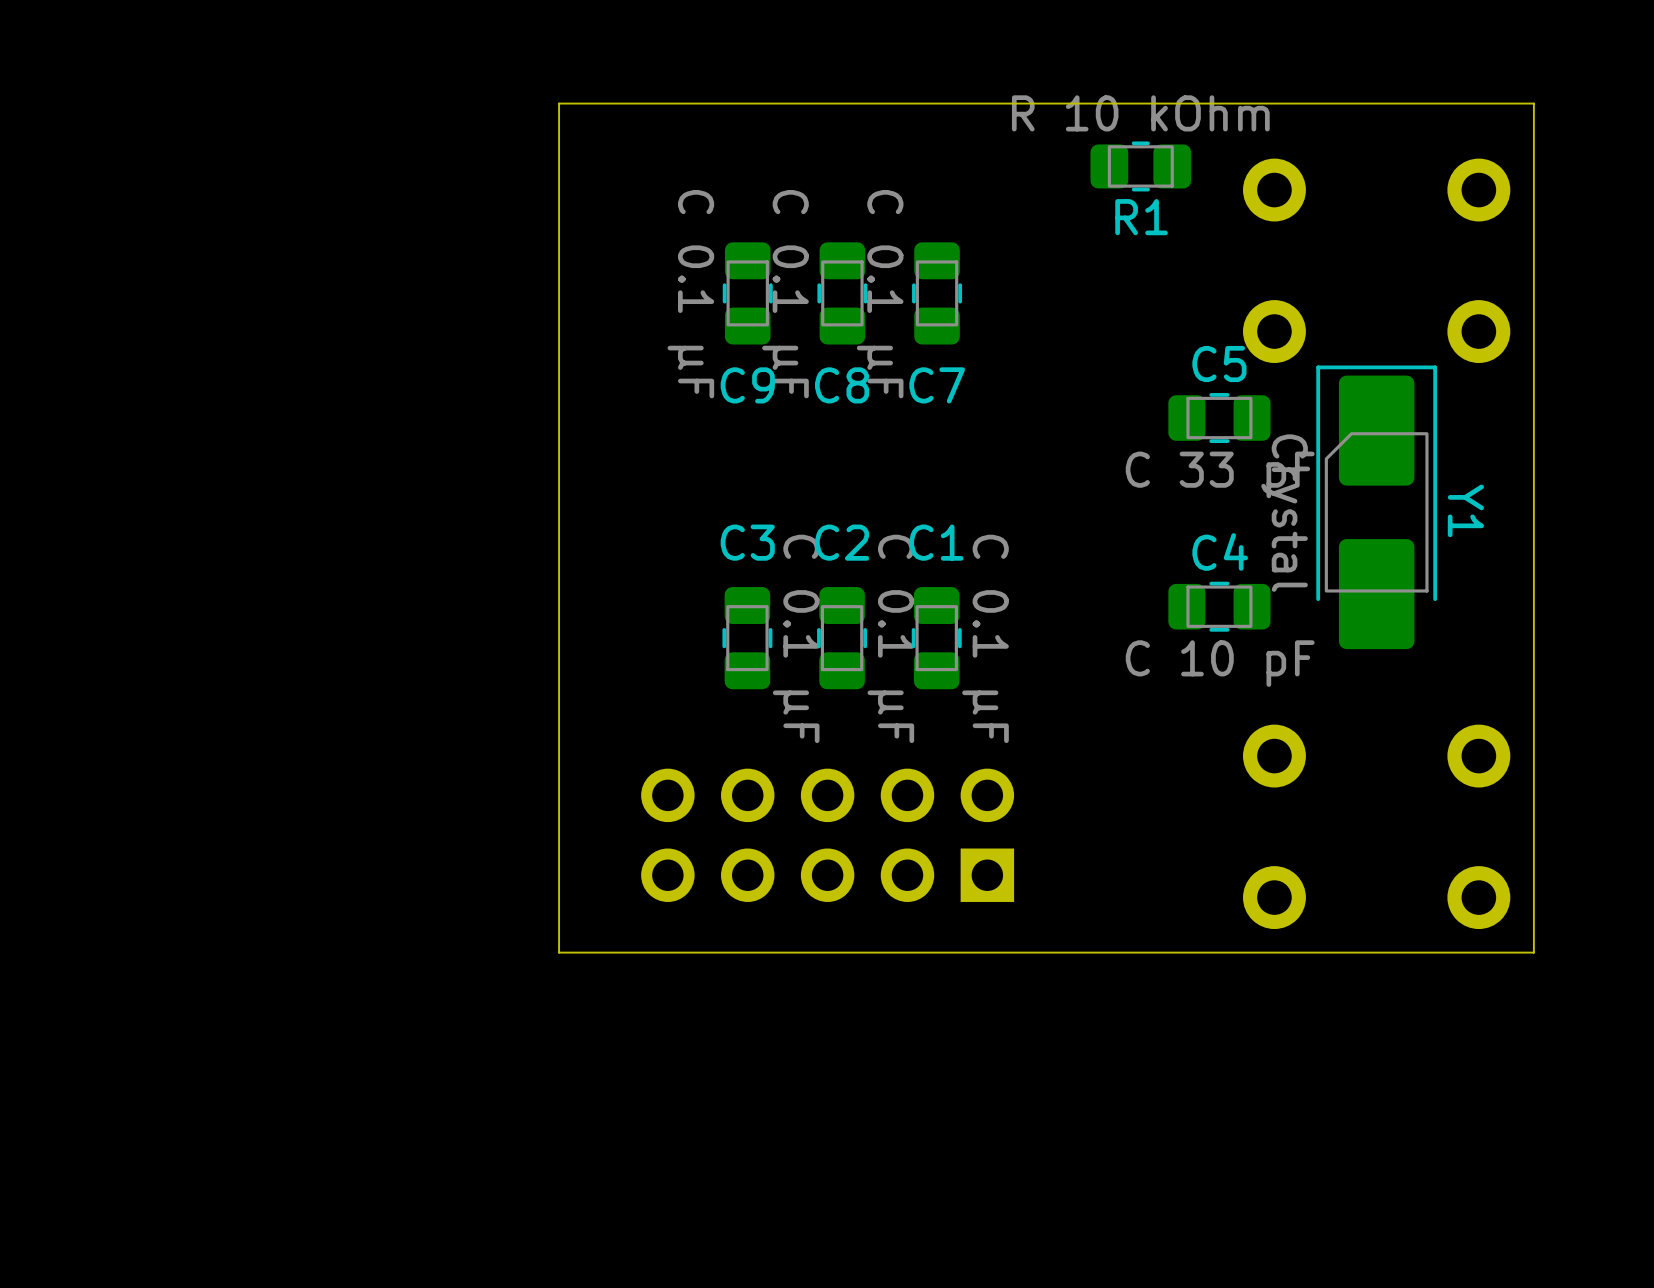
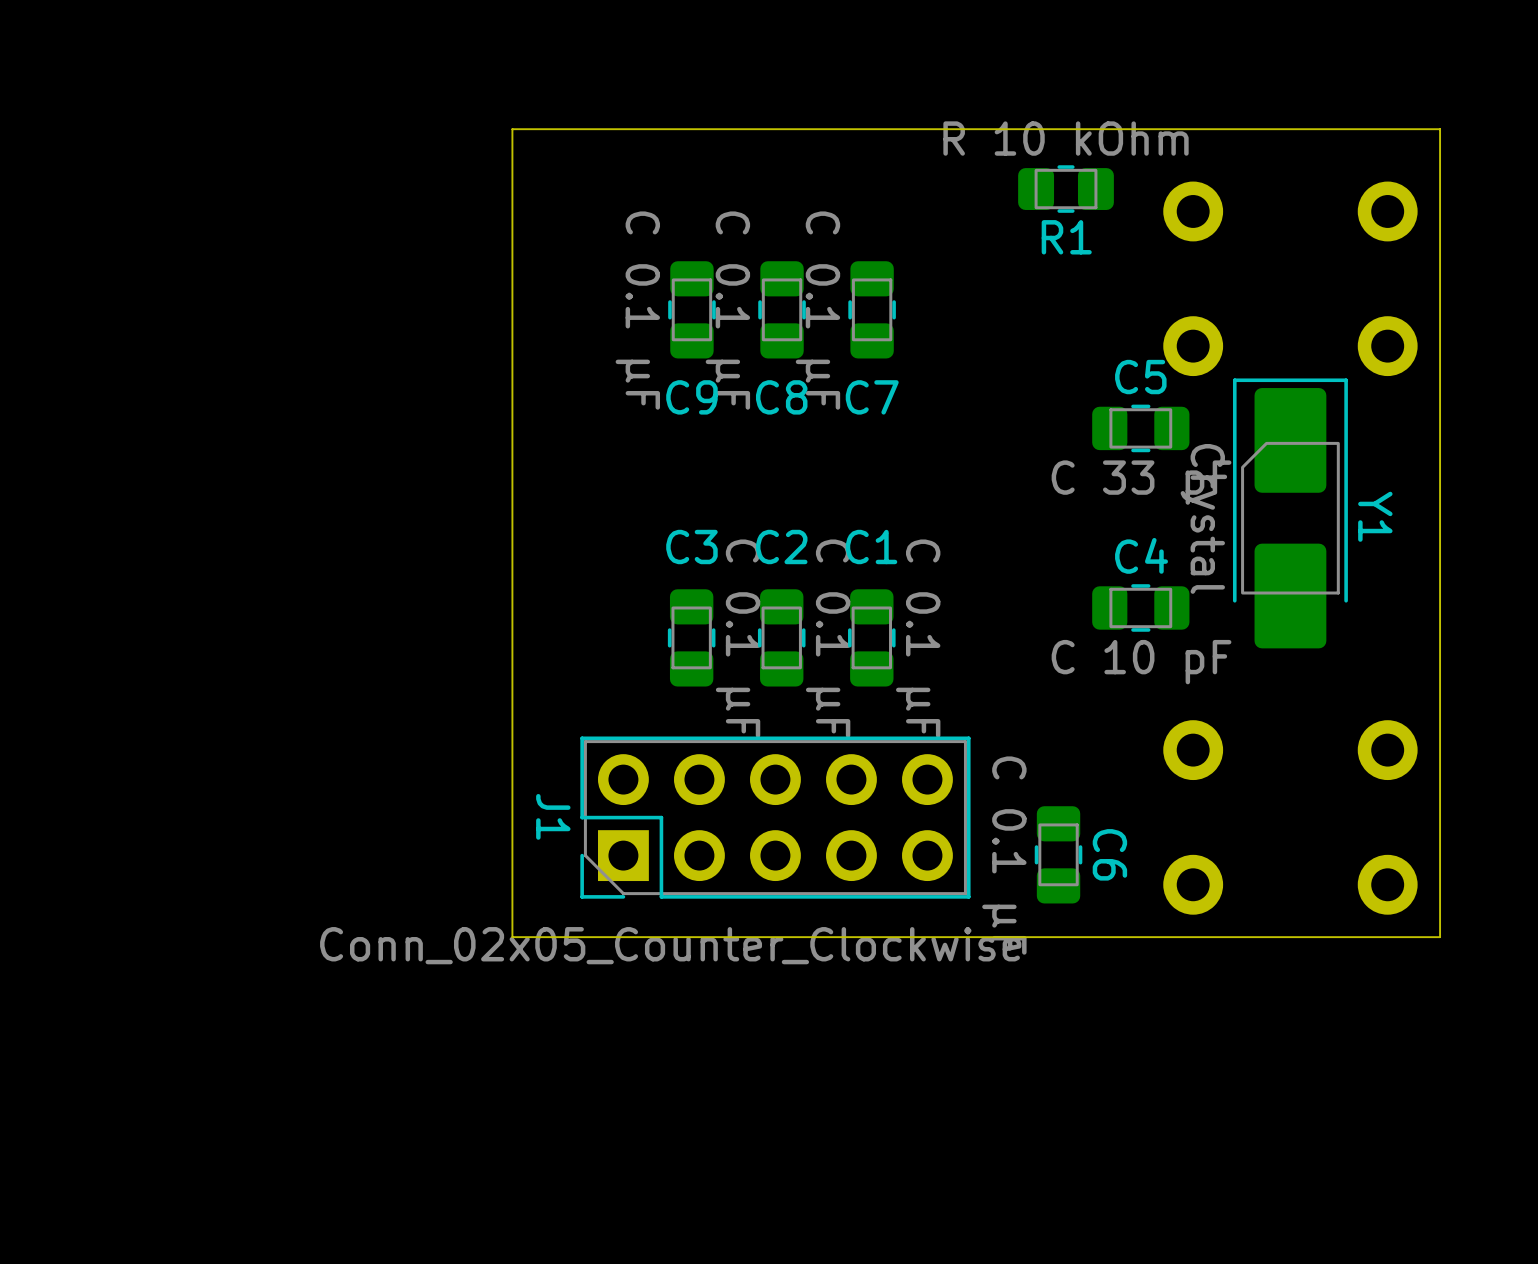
J1 side: top (827, 835) -> bottom (775, 817)
C6: none -> C 0.1 μF (1058, 854)

